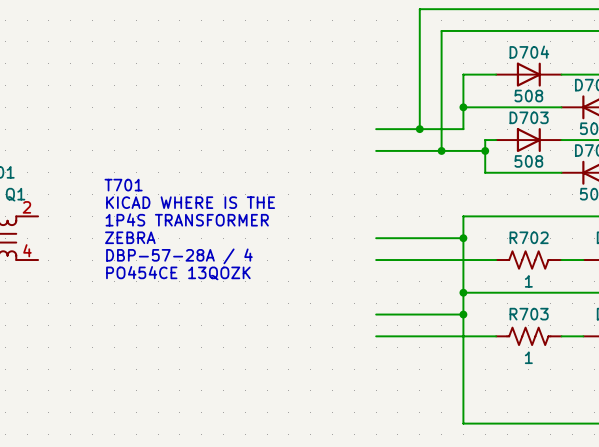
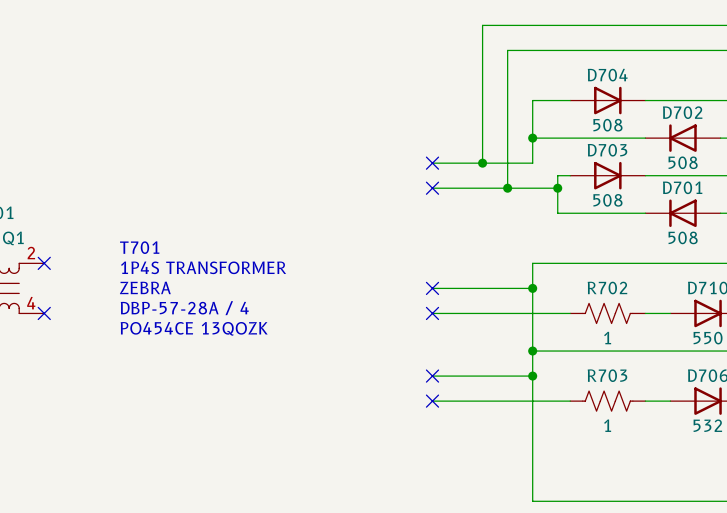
no-connect mark: none -> (432, 163)
no-connect mark: none -> (432, 188)
text: T701 (123, 185) -> none
text: KICAD WHERE IS THE (190, 202) -> T701 (139, 247)
no-connect mark: none -> (44, 263)
no-connect mark: none -> (432, 288)
no-connect mark: none -> (44, 313)
no-connect mark: none -> (432, 313)
no-connect mark: none -> (432, 376)
no-connect mark: none -> (432, 401)

